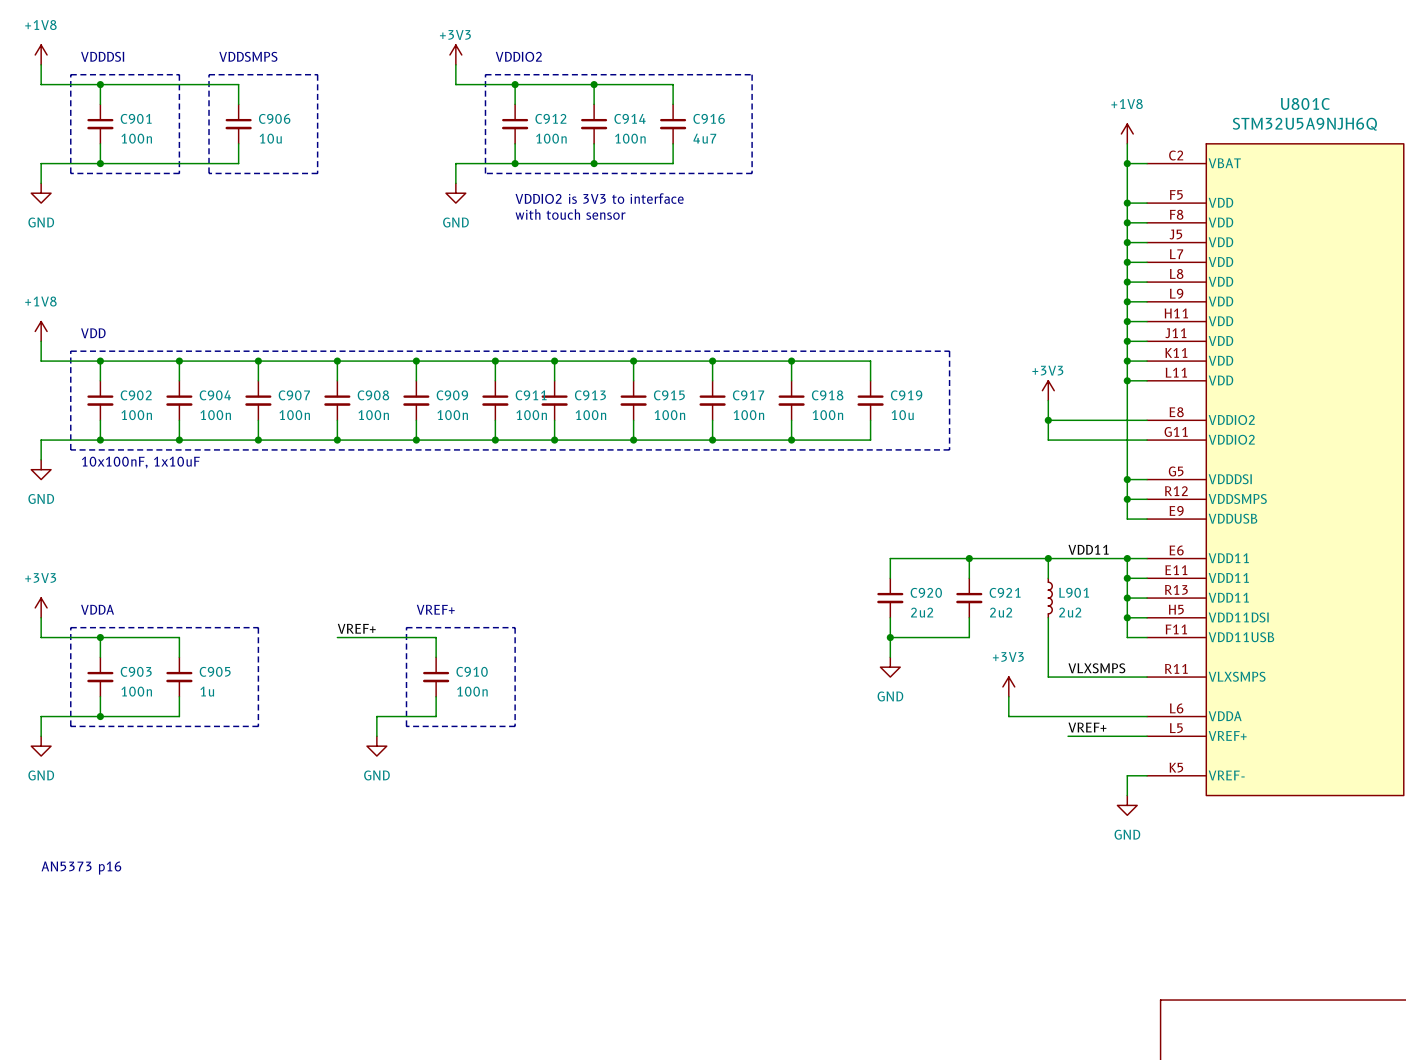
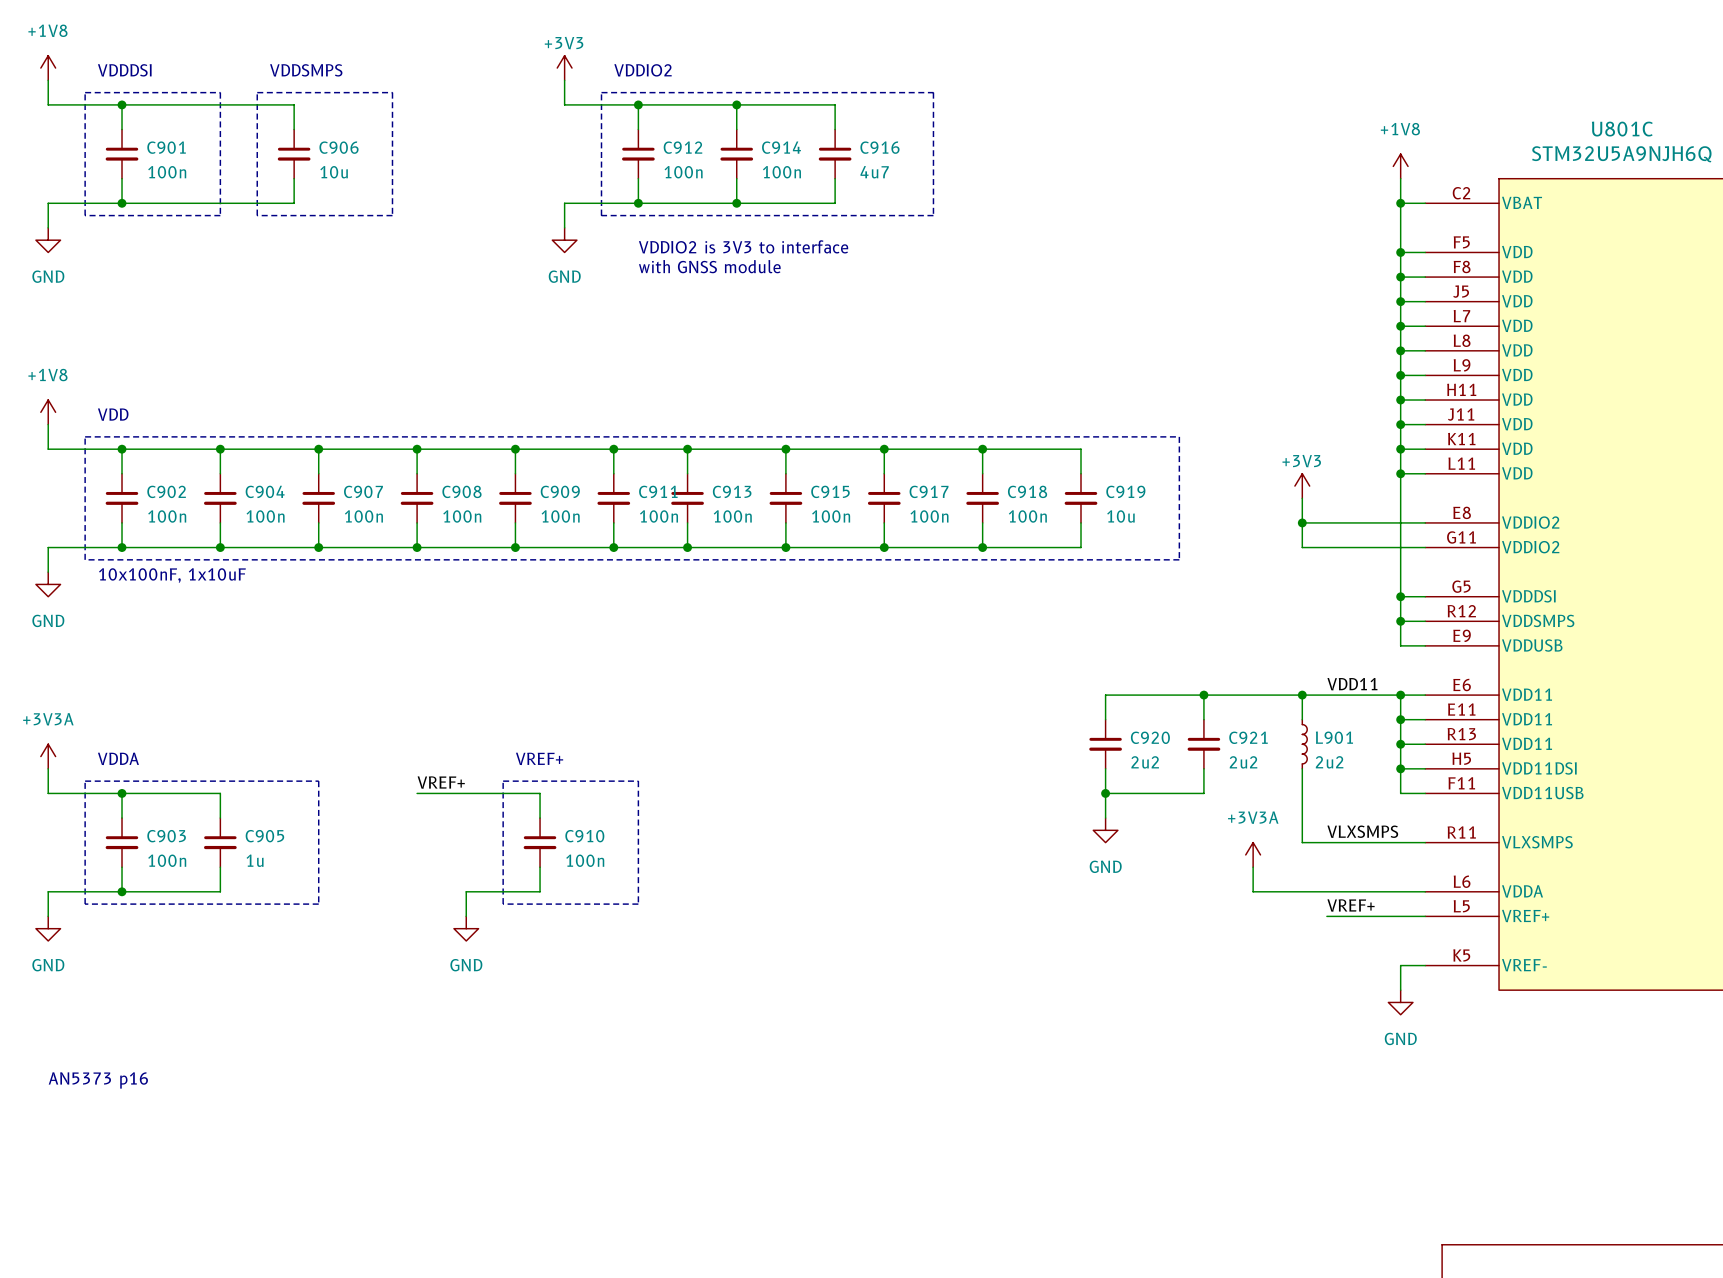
text: with touch sensor (570, 214) -> with GNSS module (709, 266)
power symbol: +3V3 (41, 607) -> +3V3A (48, 756)
power symbol: +3V3 (1008, 686) -> +3V3A (1253, 854)

